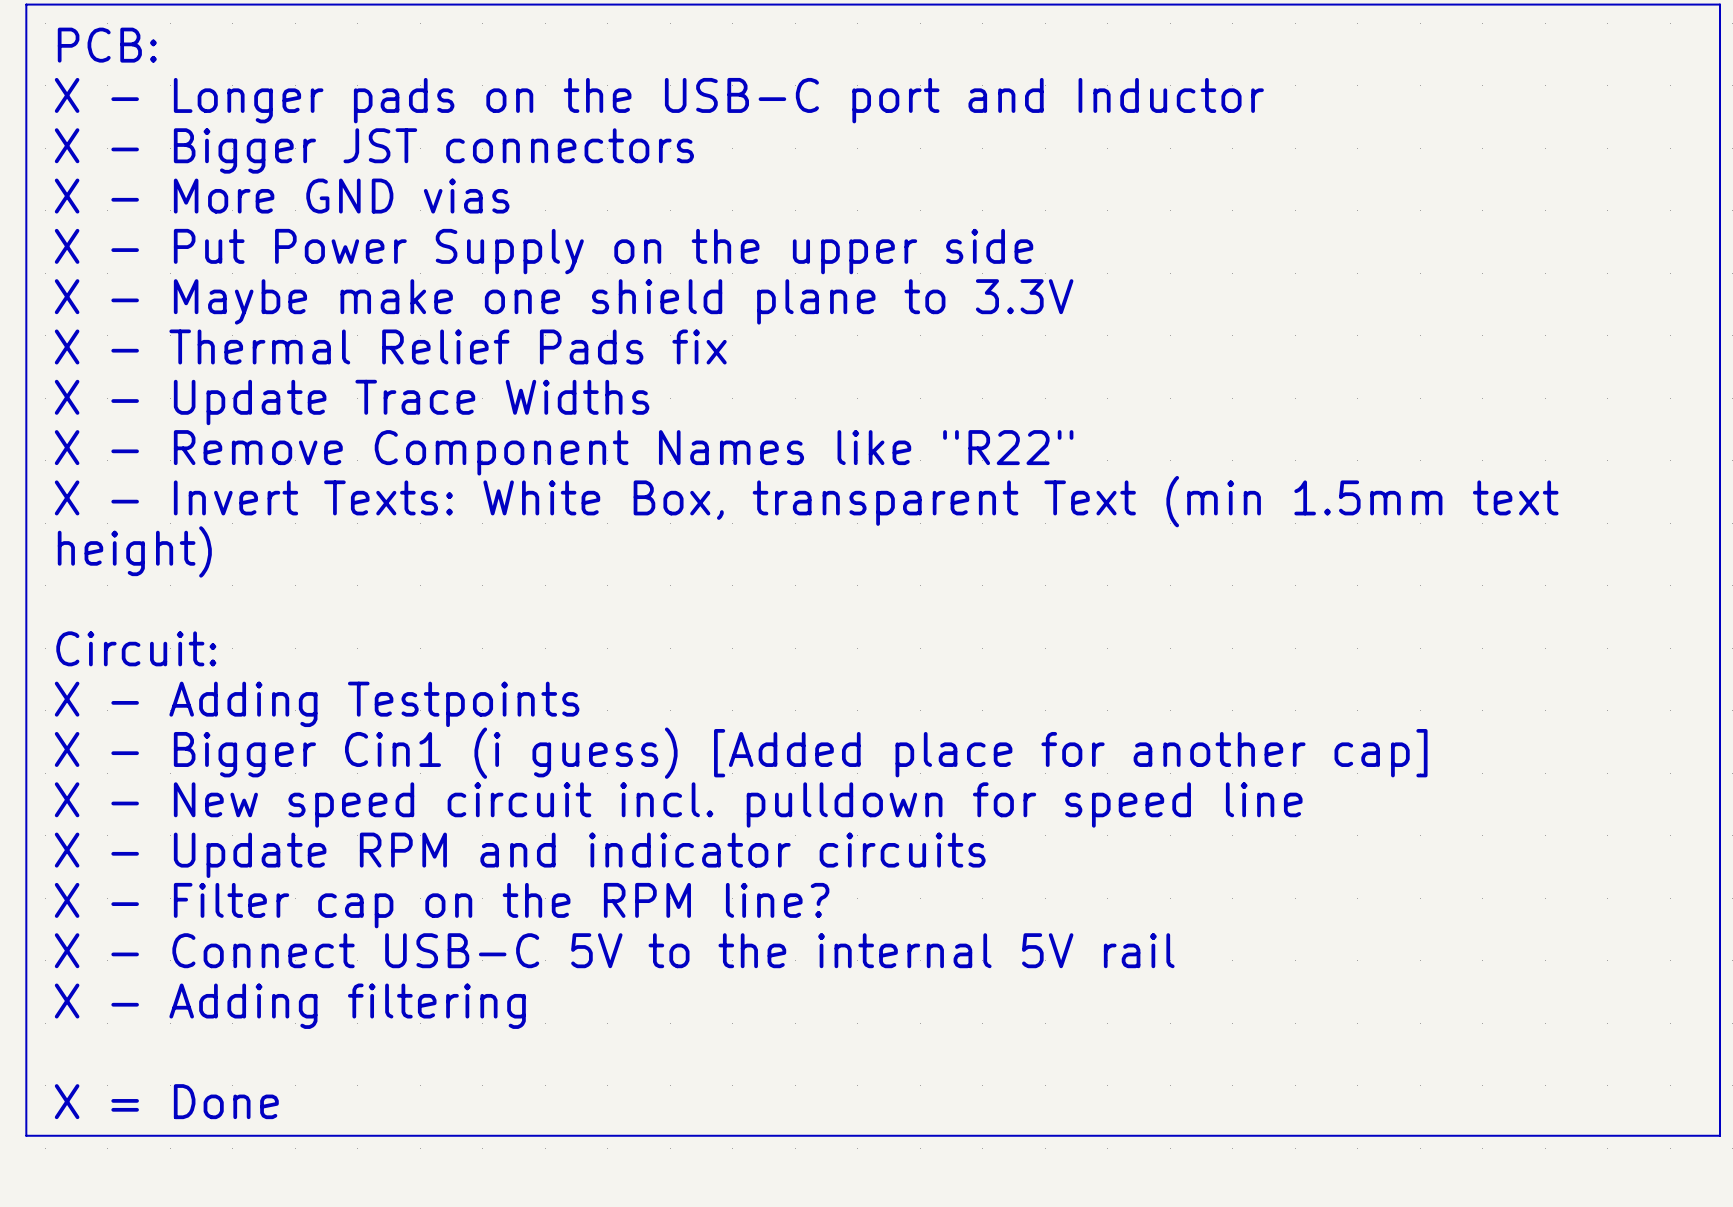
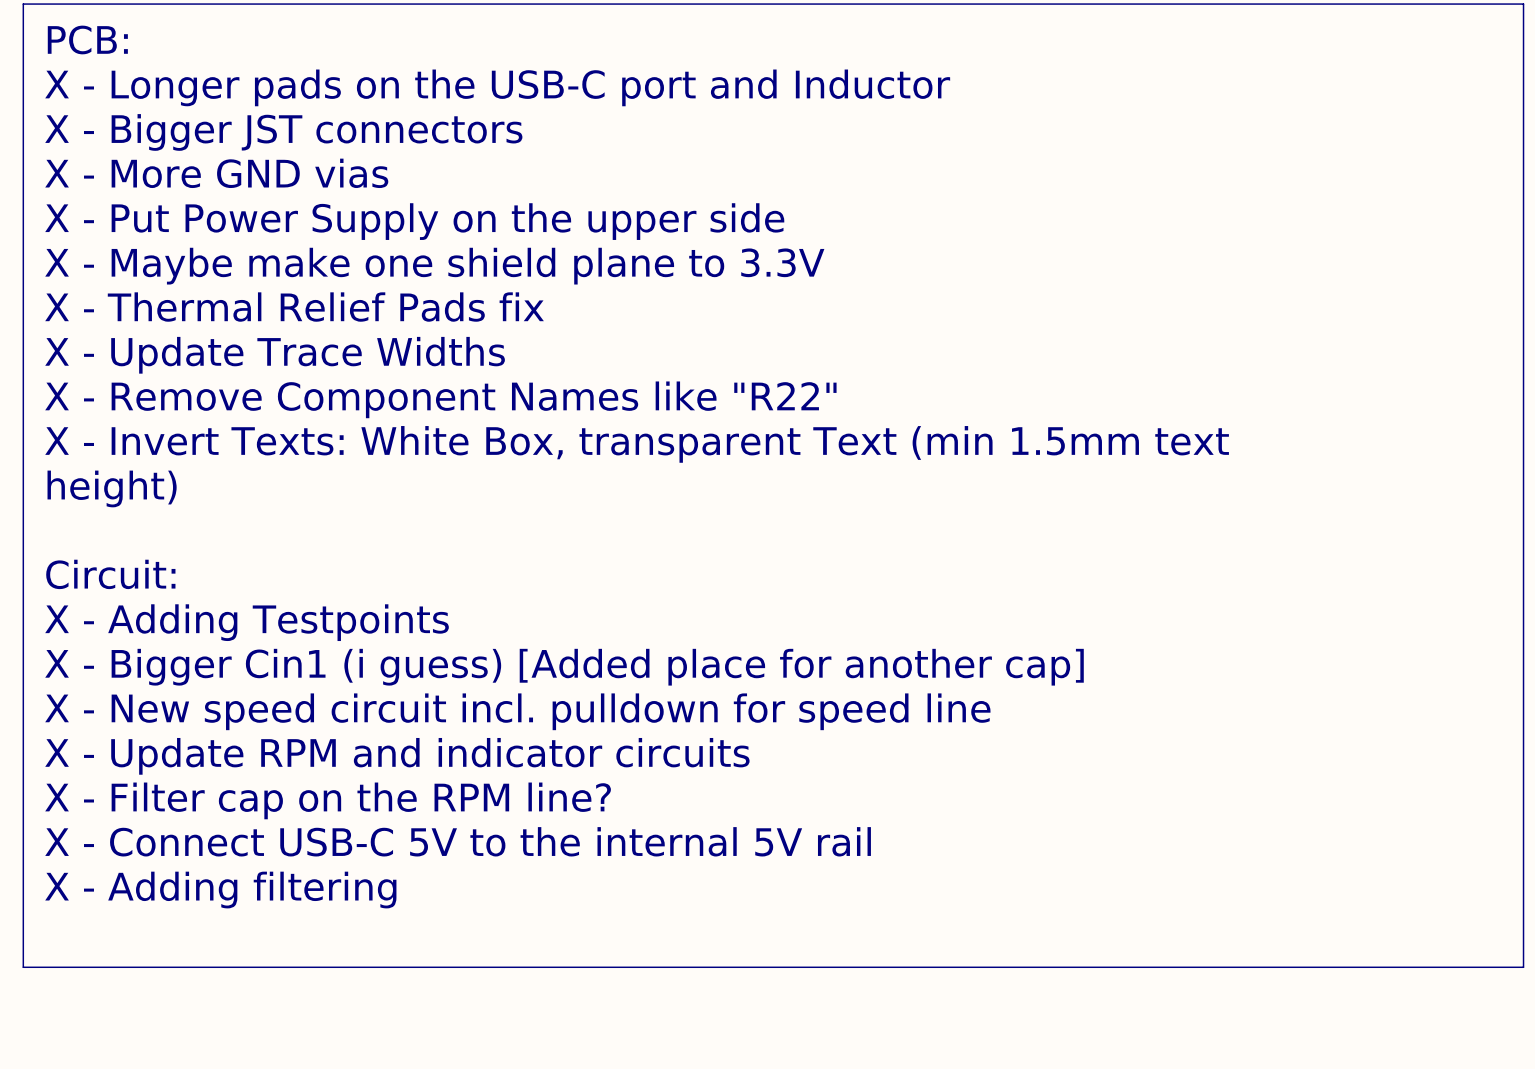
line: (26, 1092) (26, 1135) (1719, 1135) (1719, 1092) -> (23, 967) (1523, 967)
text: X = Done (166, 1101) -> none

